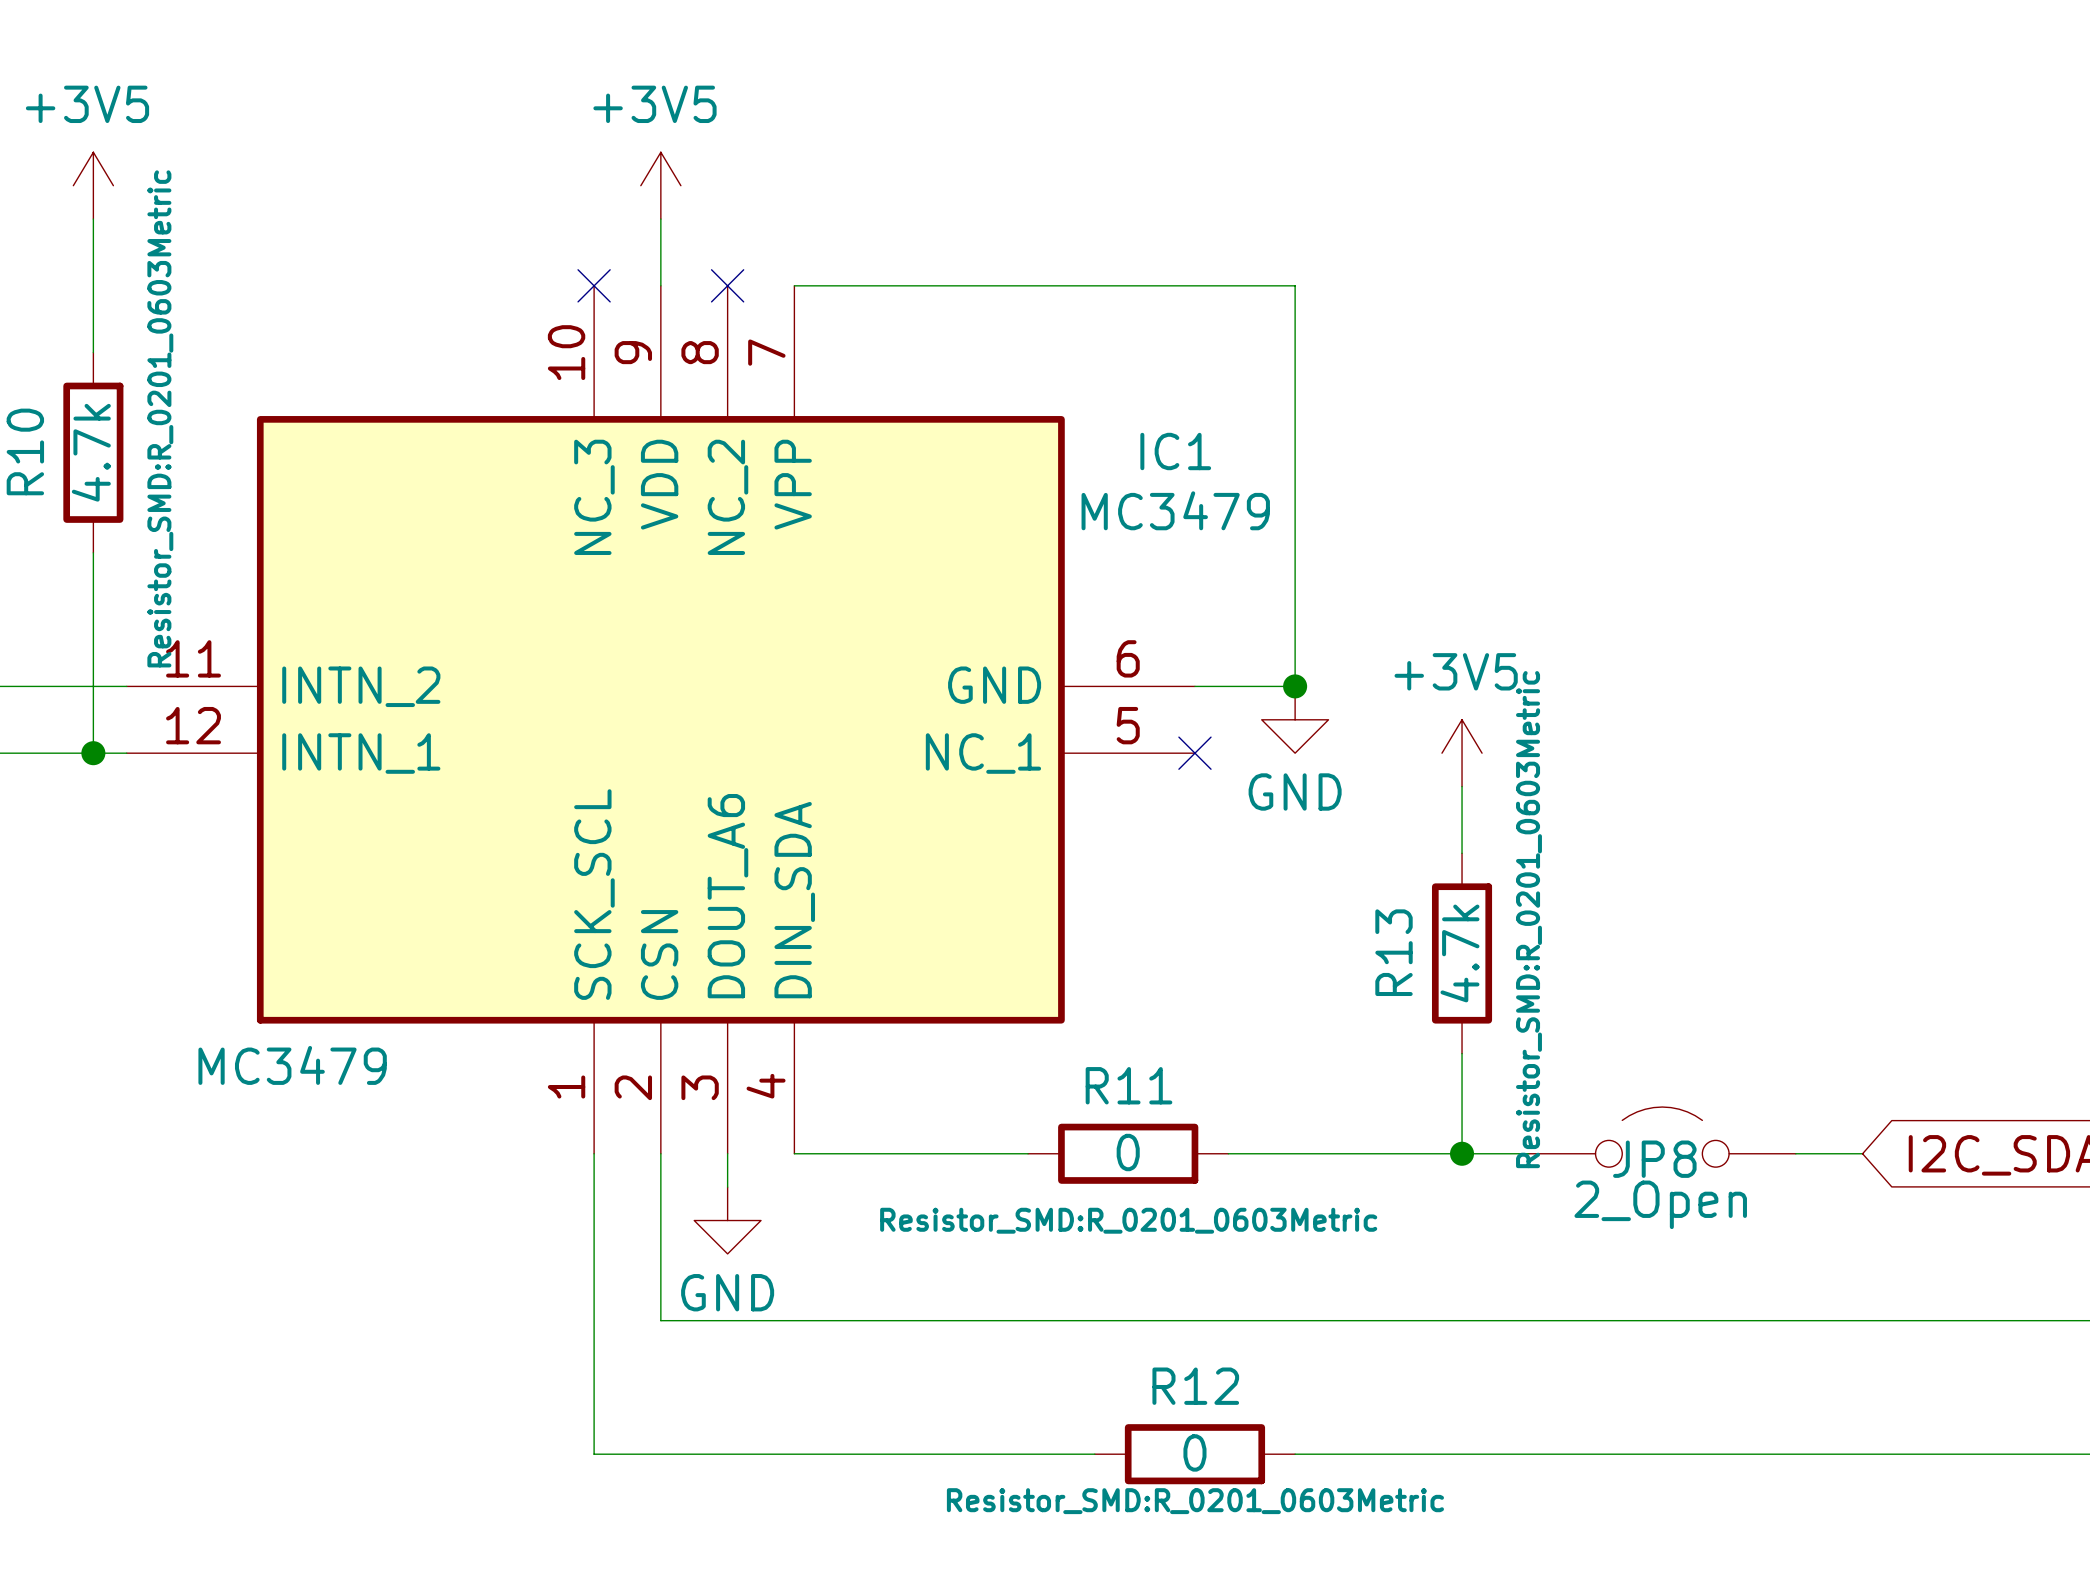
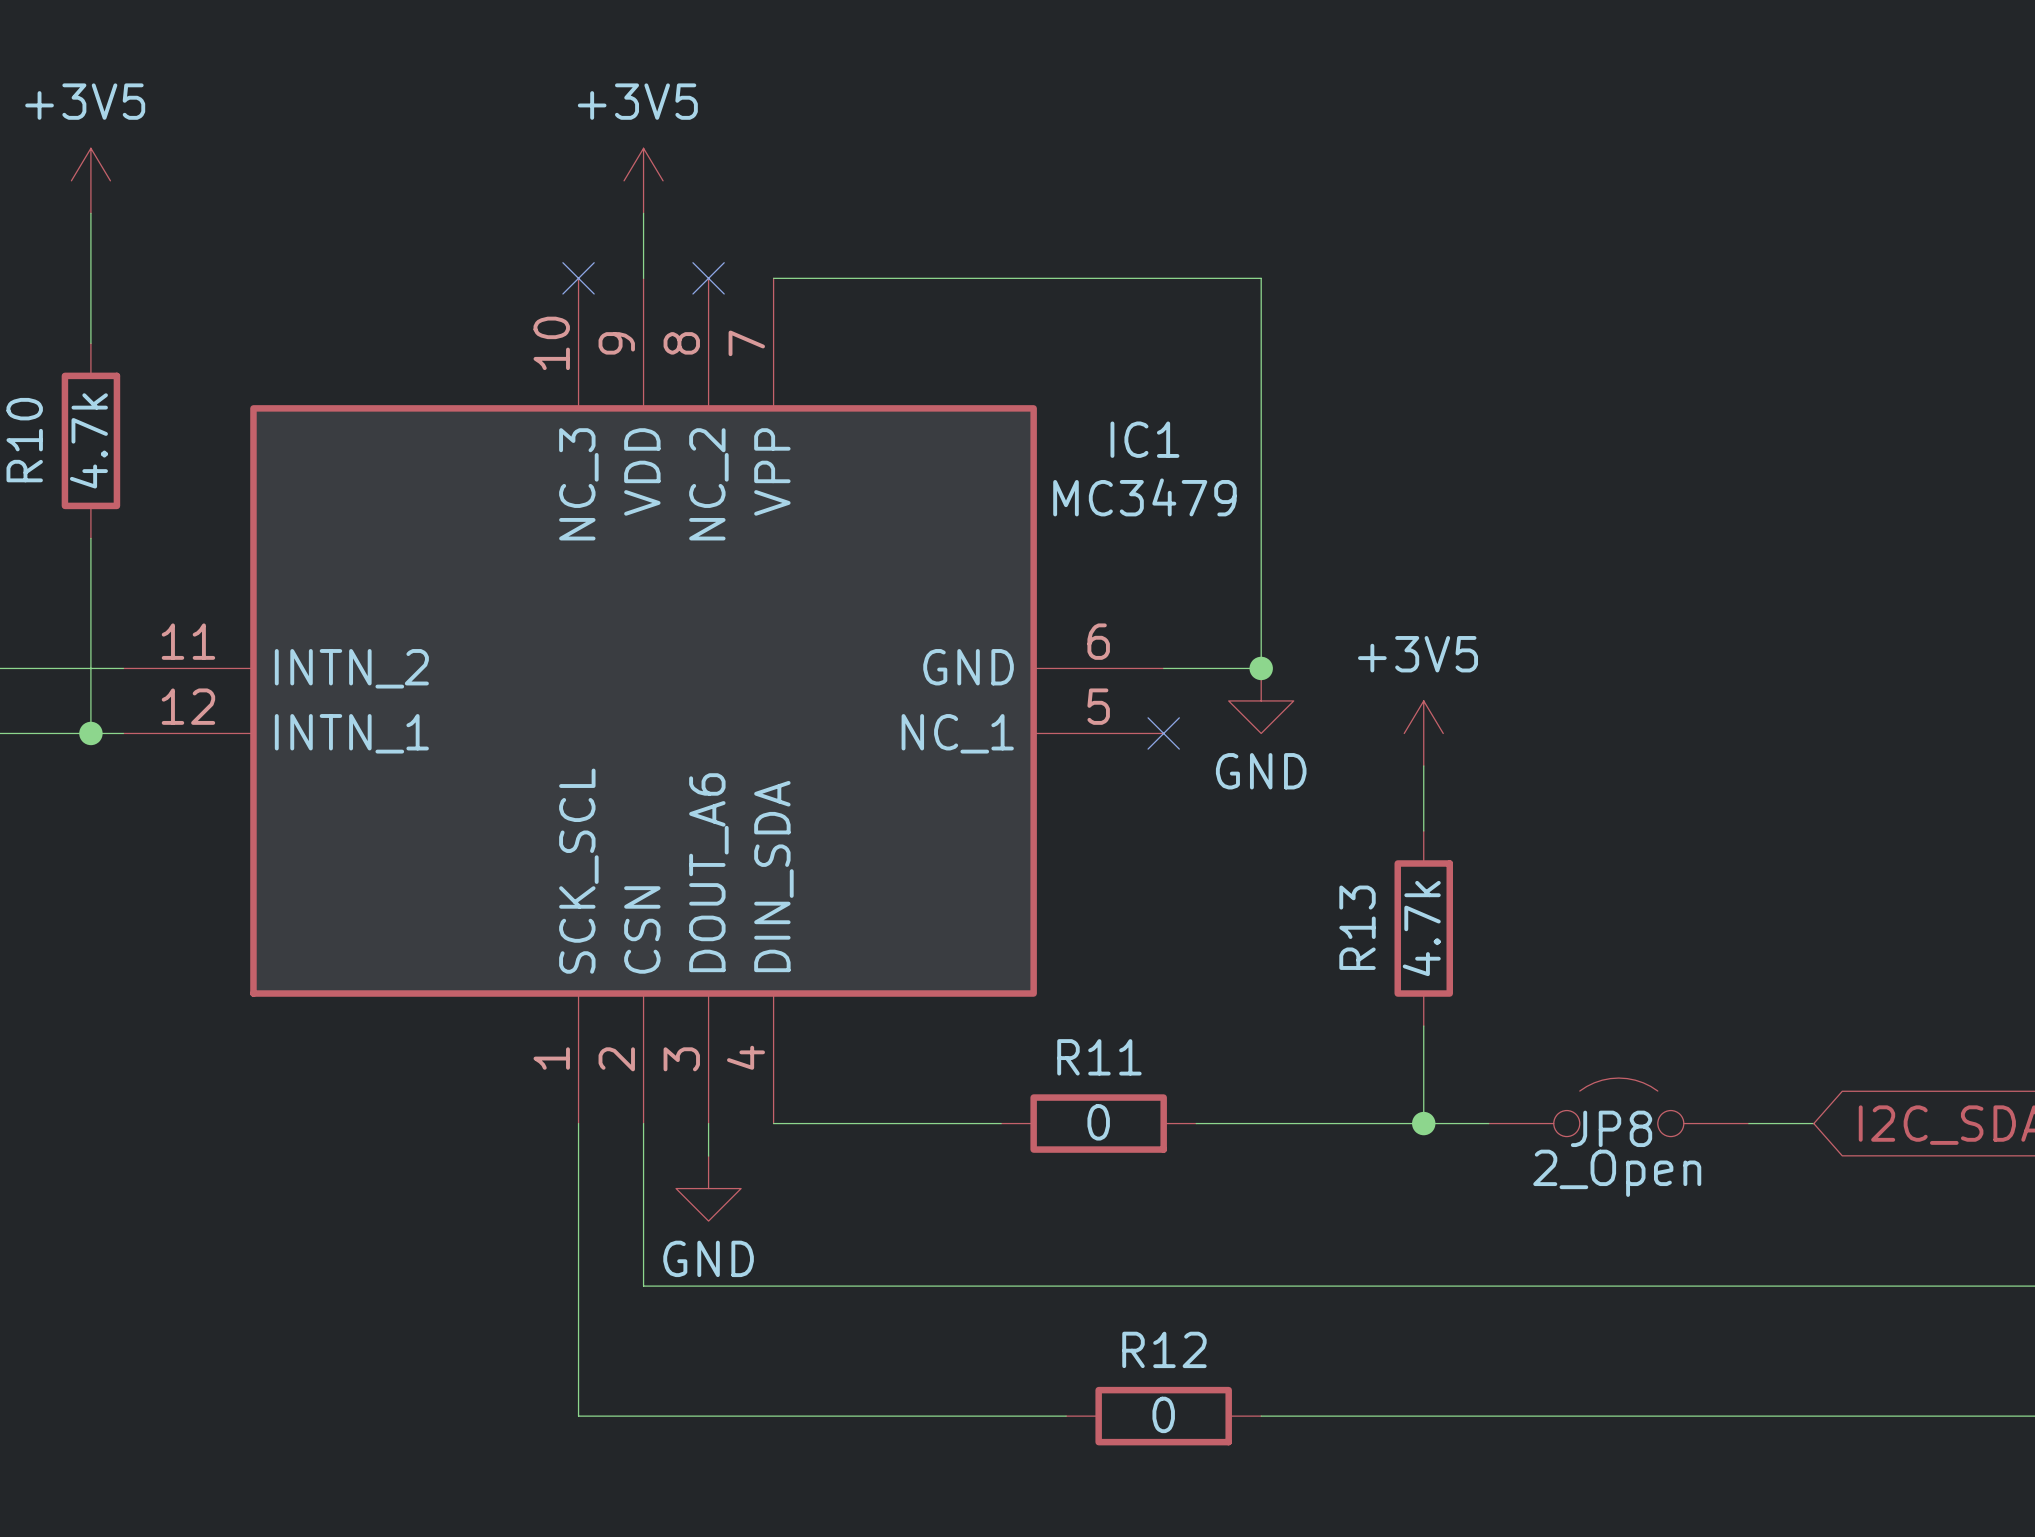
R10 text: Resistor_SMD:R_0201_0603Metric (160, 418) -> none
R13 text: Resistor_SMD:R_0201_0603Metric (1528, 919) -> none
IC1 text: MC3479 (292, 1065) -> none
R11 text: Resistor_SMD:R_0201_0603Metric (1128, 1220) -> none
R12 text: Resistor_SMD:R_0201_0603Metric (1195, 1501) -> none

